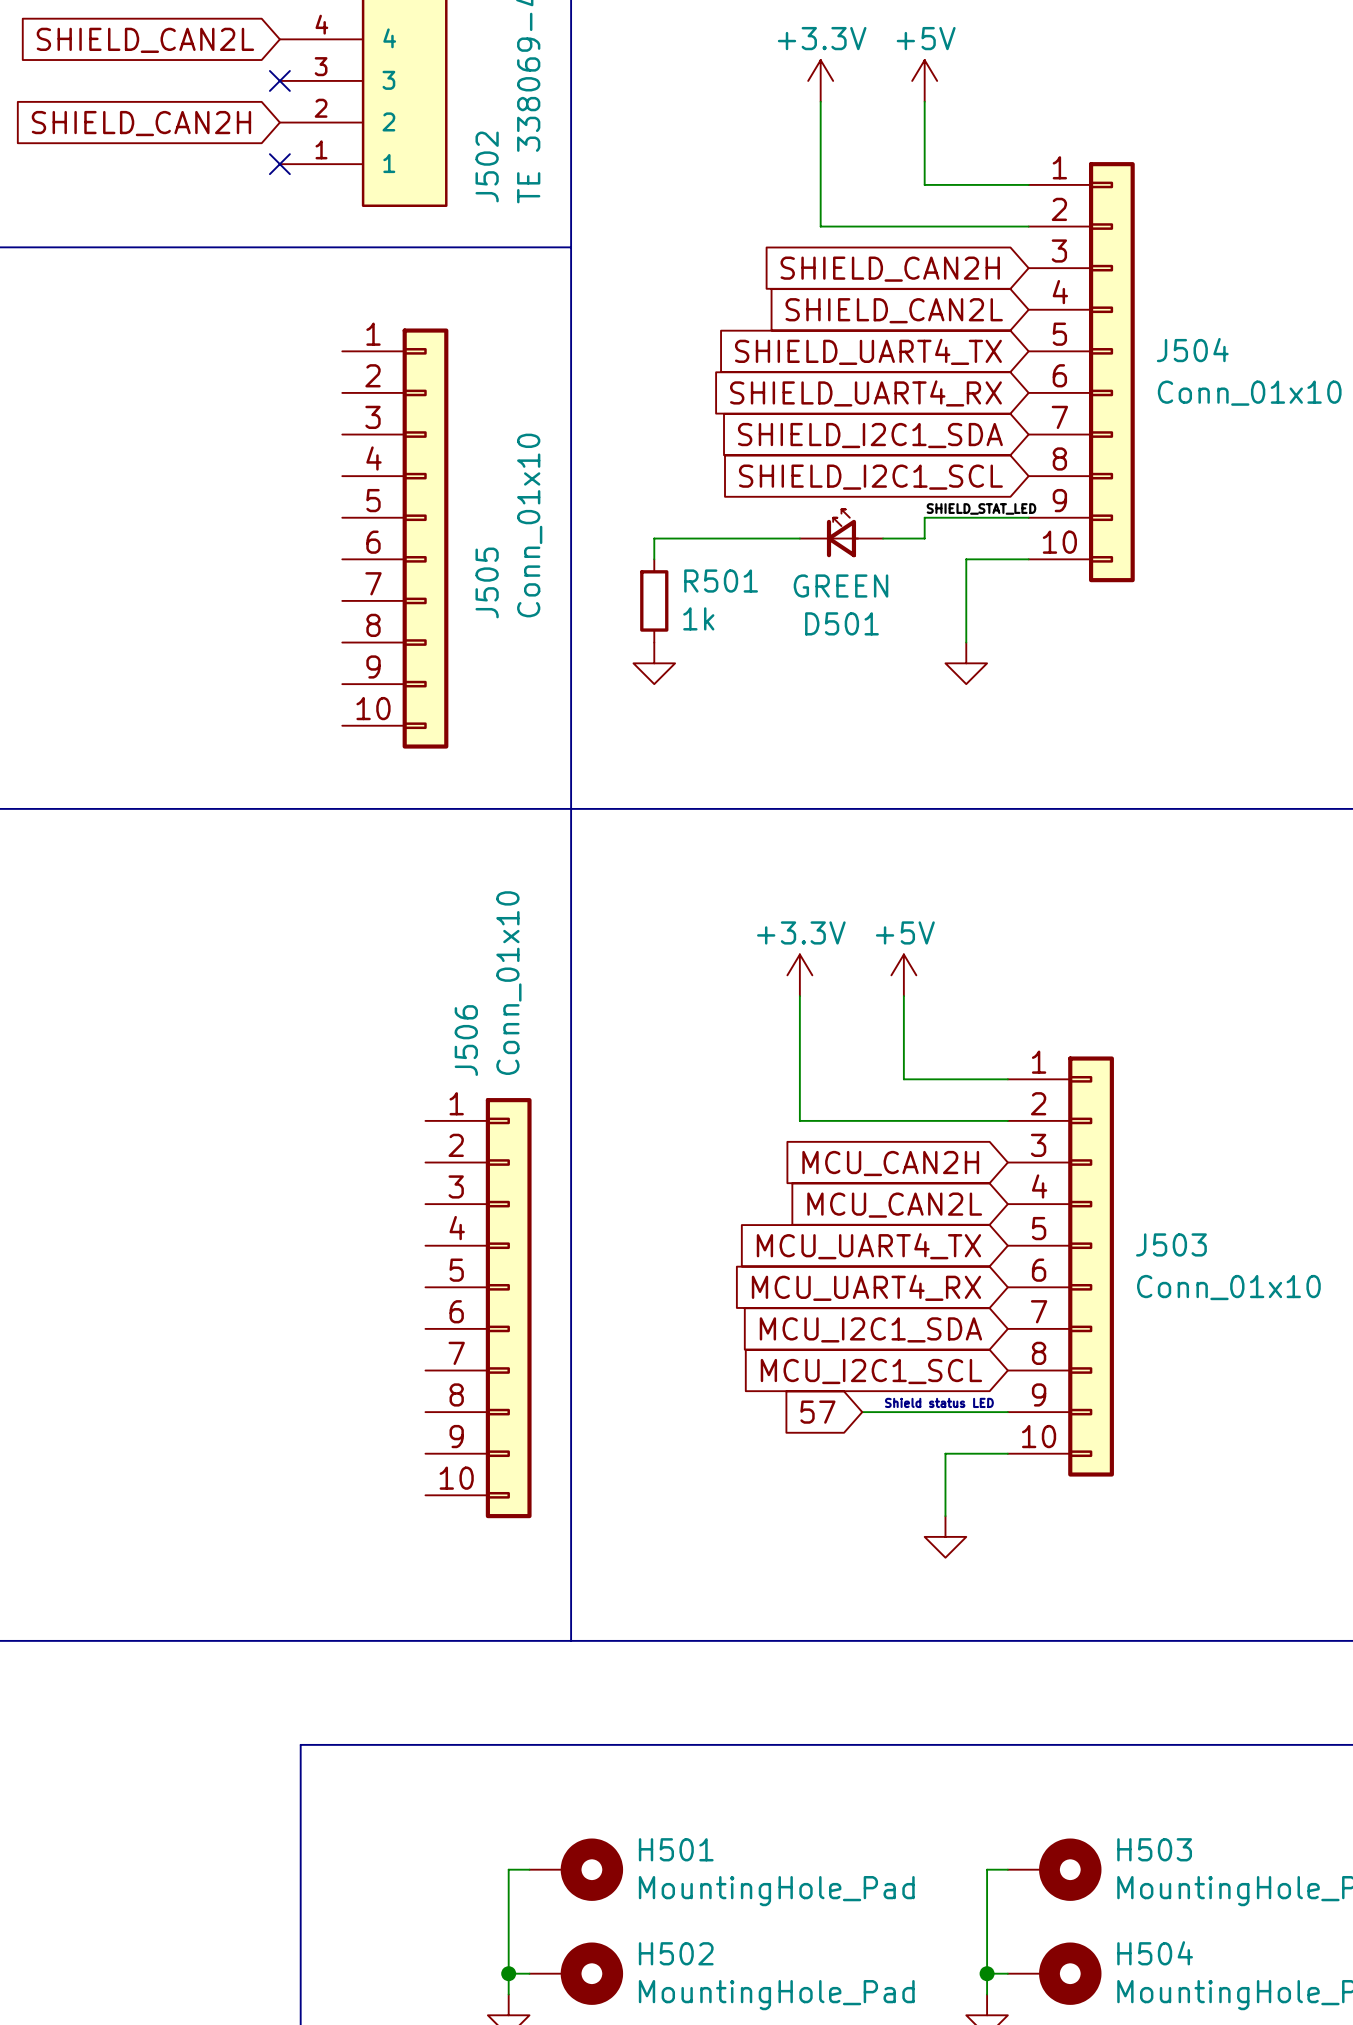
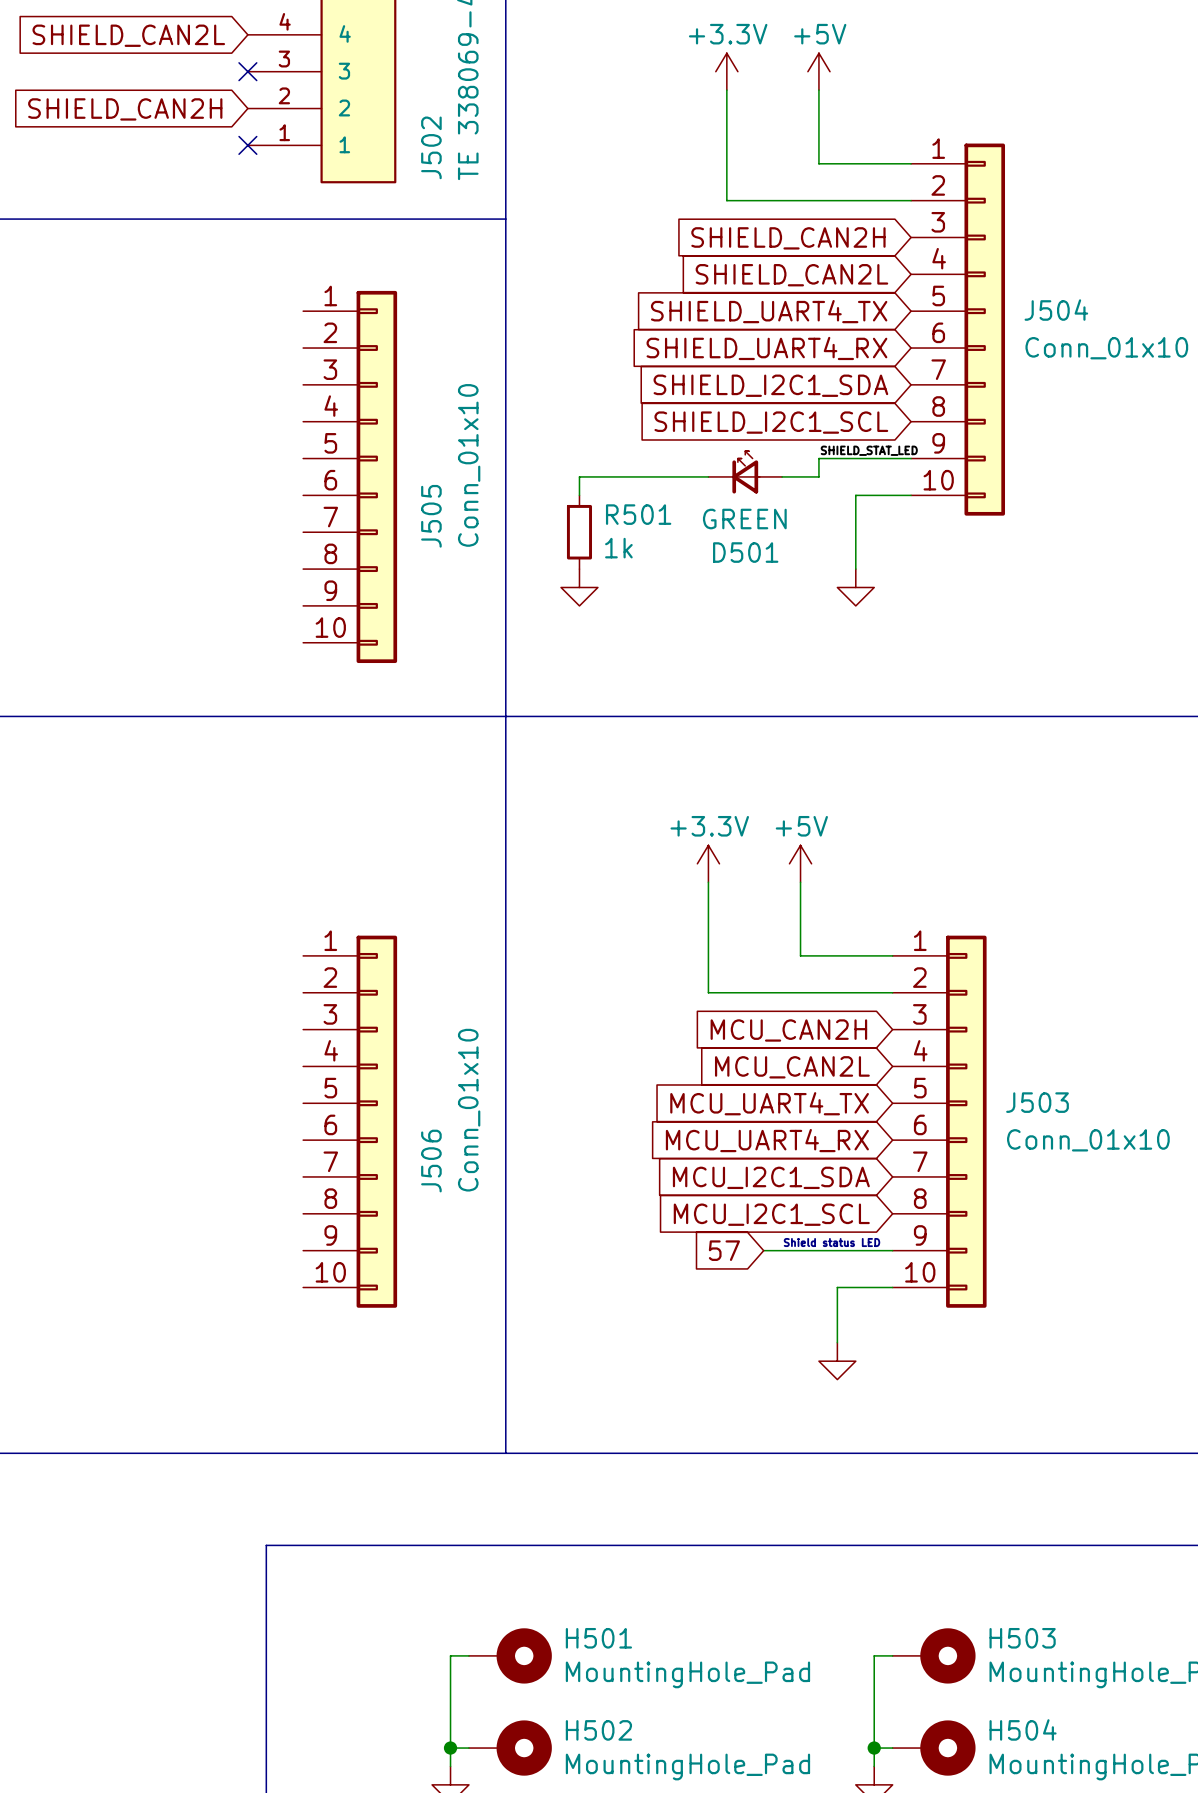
J506 value position: Conn_01x10 (508, 983) -> Conn_01x10 (469, 1110)
J506 name position: J506 (466, 1040) -> J506 (431, 1161)
J506 position: (478, 1308) -> (350, 1121)

